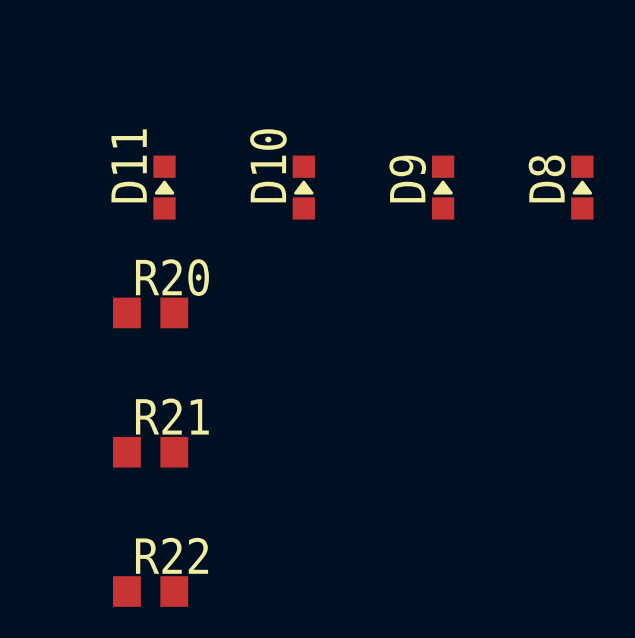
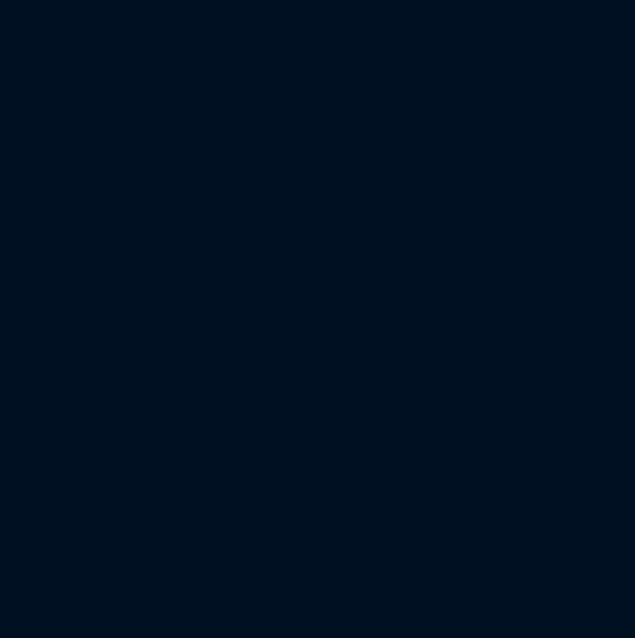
D11: (164, 187) -> none
D10: (303, 187) -> none
D9: (443, 187) -> none
D8: (582, 187) -> none
R20: (150, 312) -> none
R21: (150, 452) -> none
R22: (150, 591) -> none

